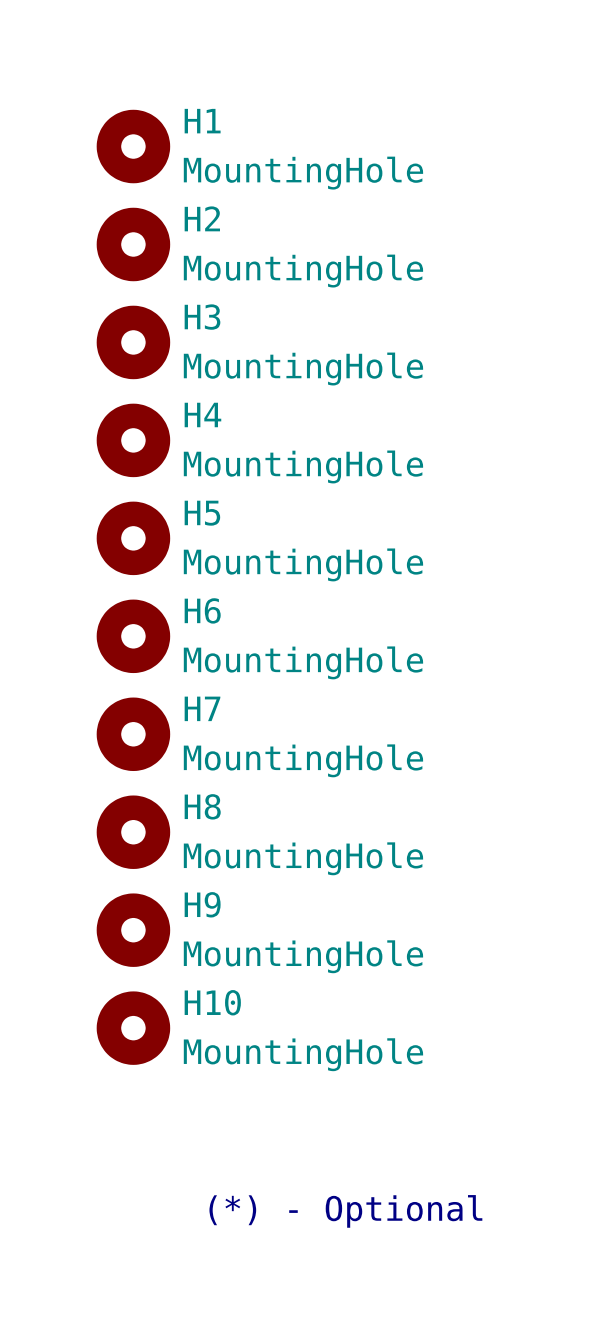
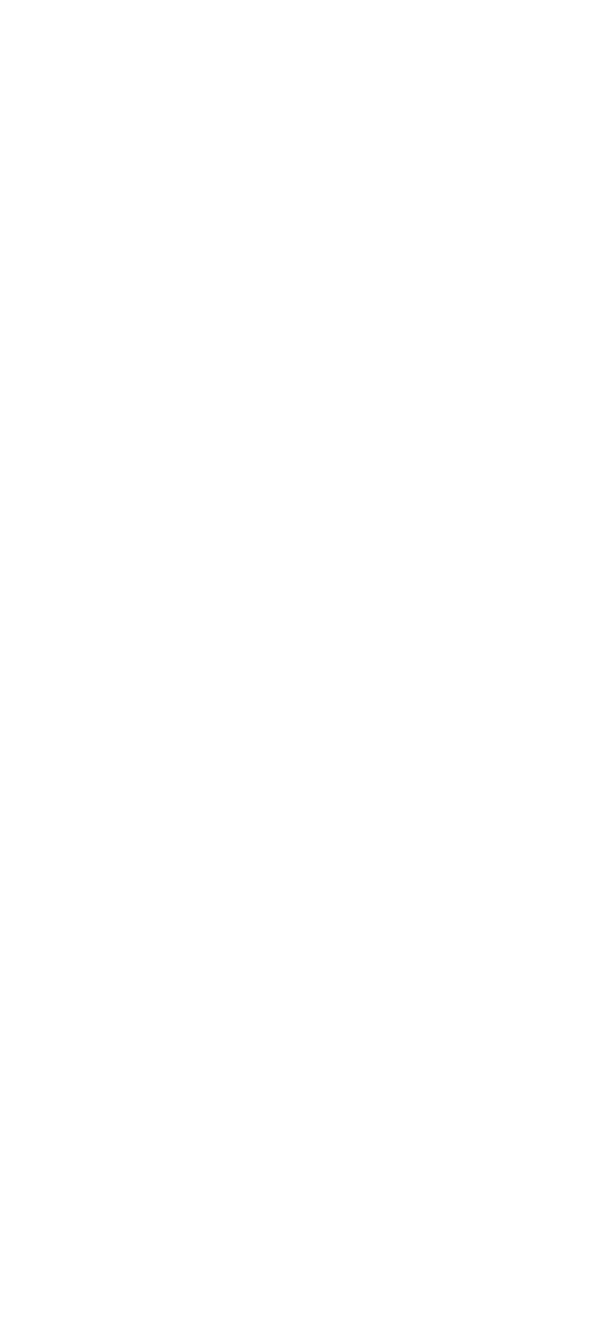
H1: MountingHole (133, 146) -> none
H2: MountingHole (133, 244) -> none
H3: MountingHole (133, 342) -> none
H4: MountingHole (133, 440) -> none
H5: MountingHole (133, 538) -> none
H6: MountingHole (133, 636) -> none
H7: MountingHole (133, 734) -> none
H8: MountingHole (133, 832) -> none
H9: MountingHole (133, 930) -> none
H10: MountingHole (133, 1028) -> none
text: (*) - Optional (345, 1211) -> none

